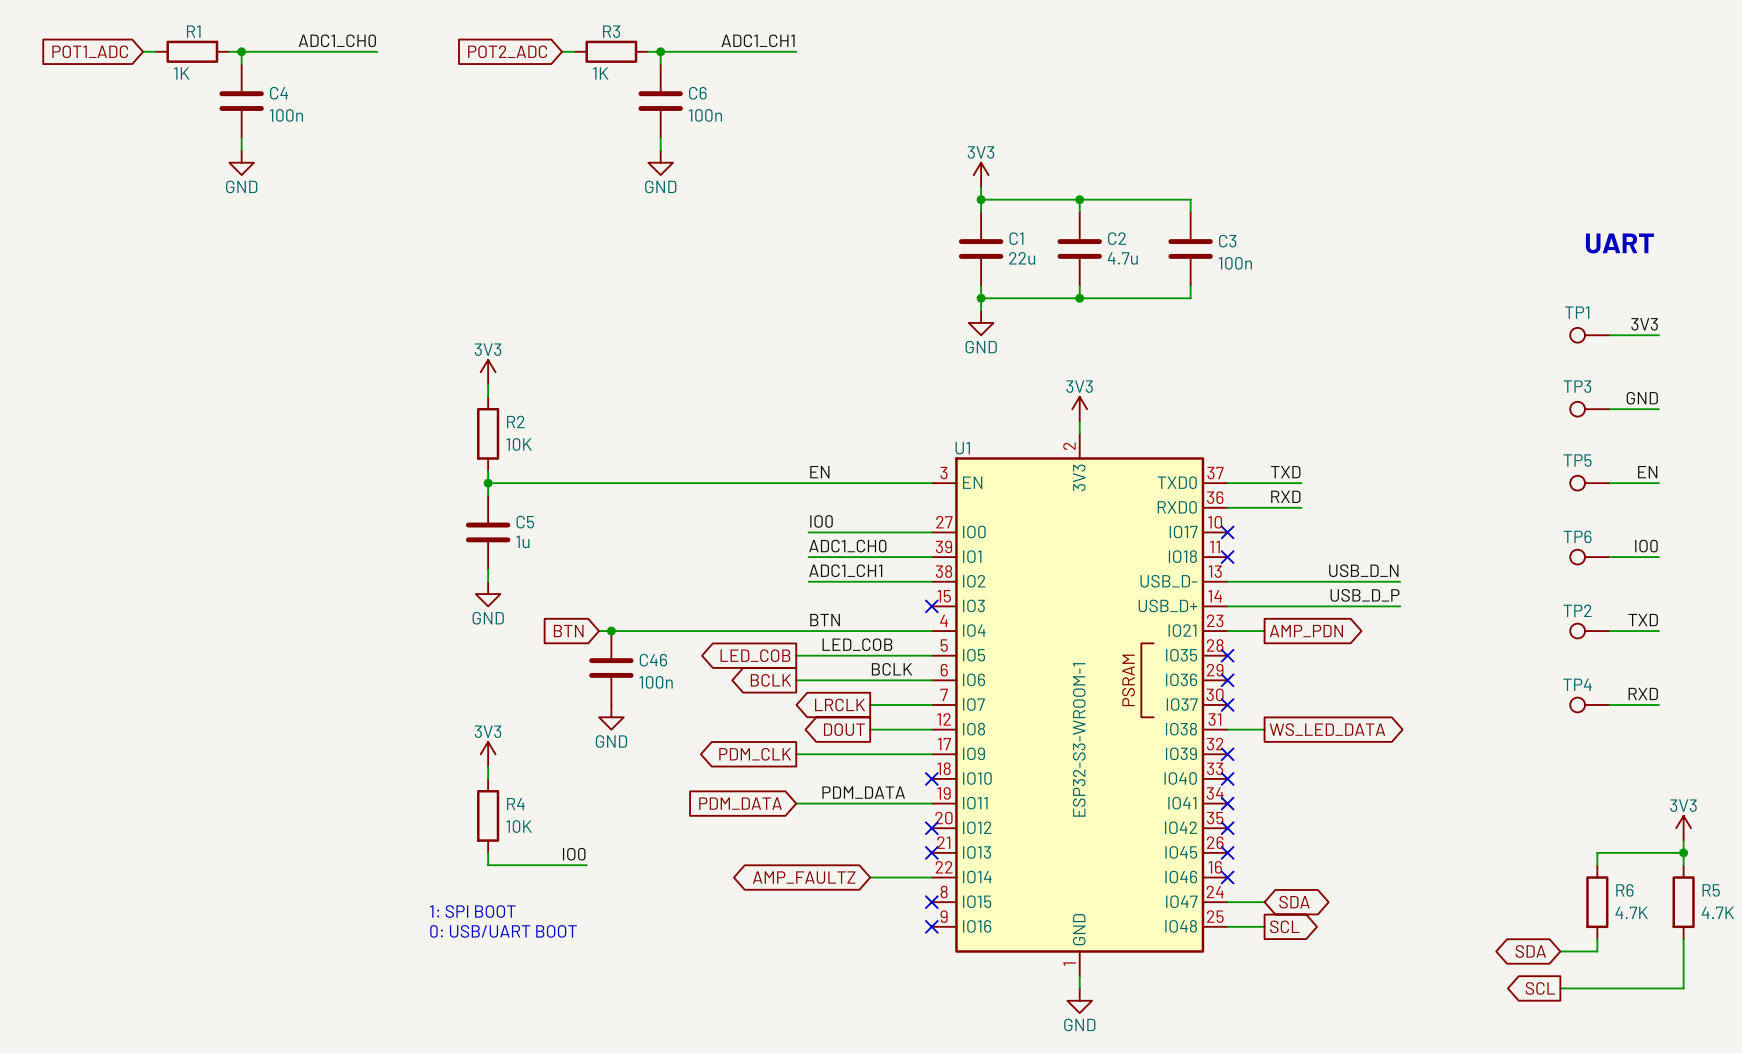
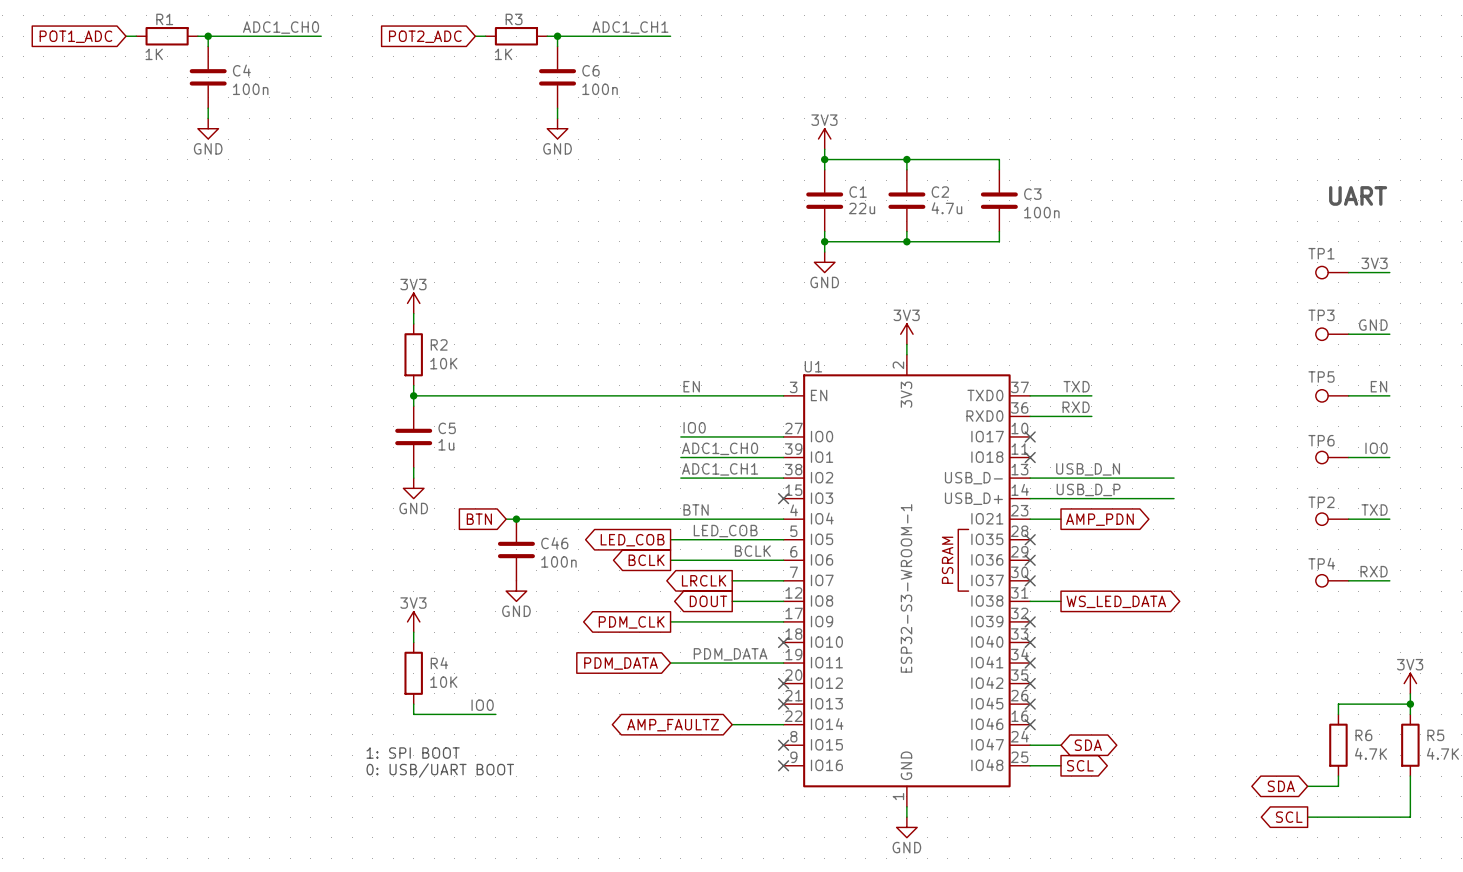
label position: USB_D_N (1363, 570) -> USB_D_N (1088, 469)
label position: USB_D_P (1365, 595) -> USB_D_P (1088, 489)

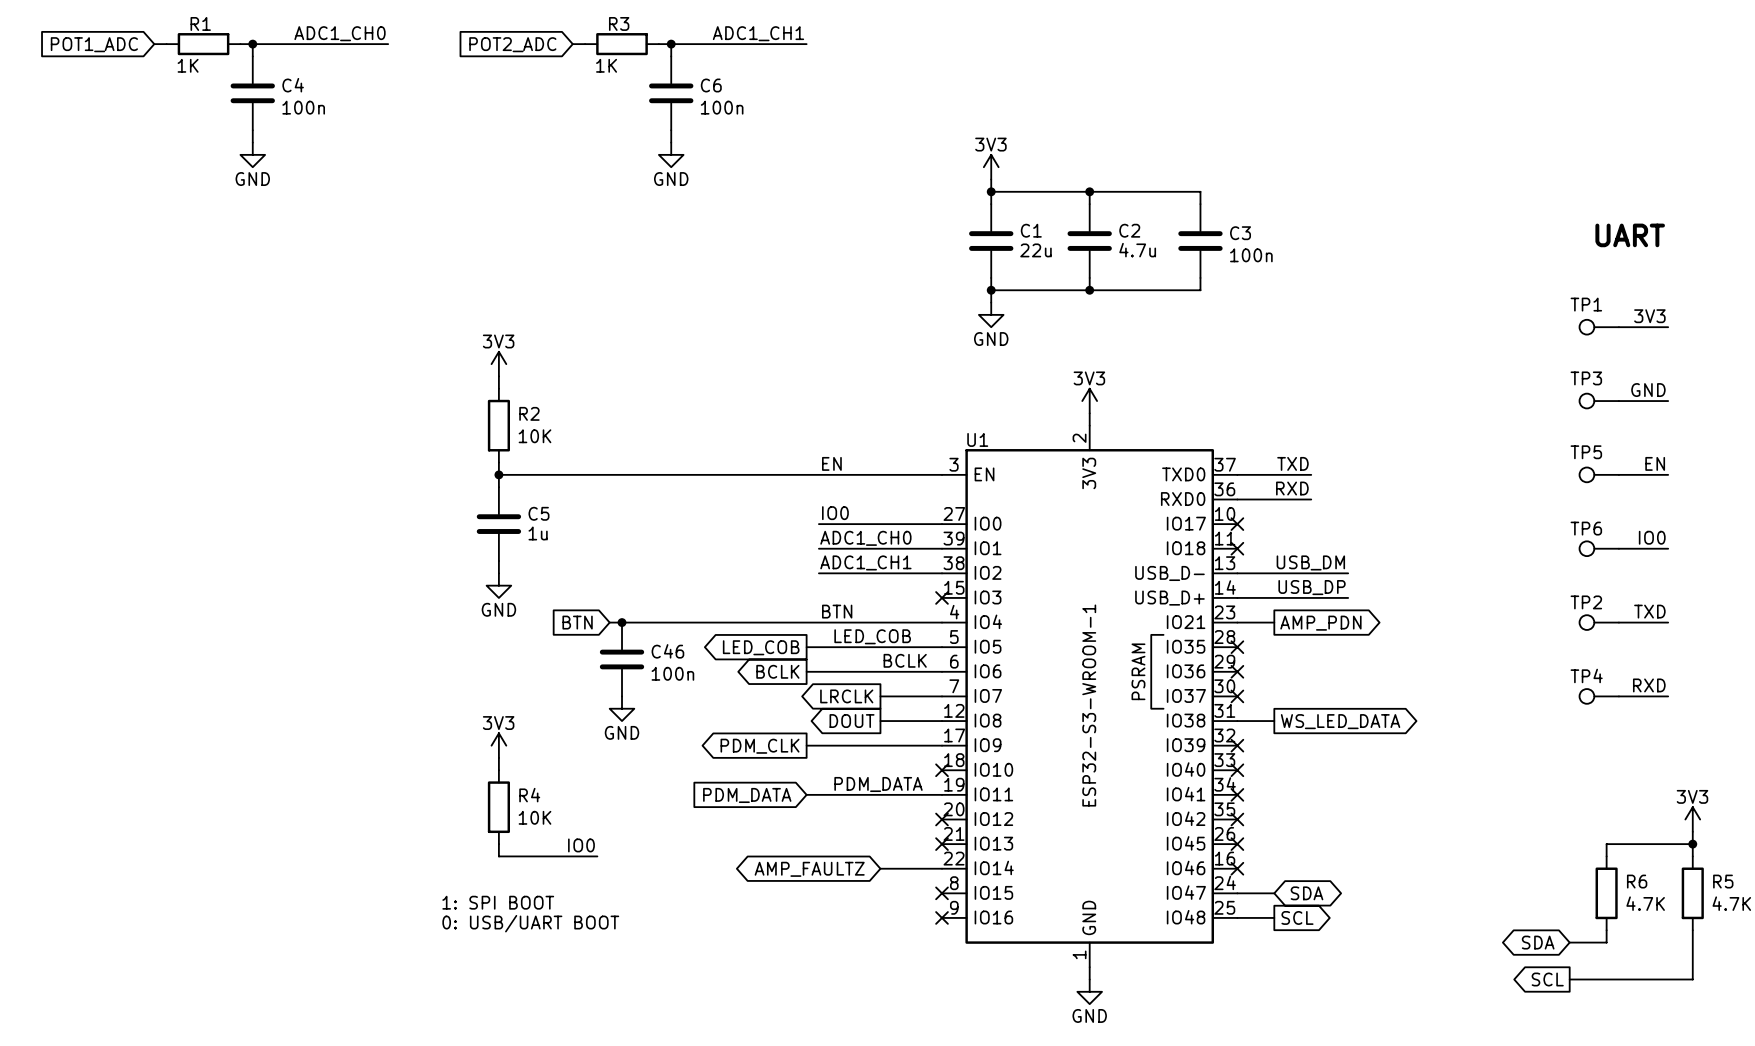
label: USB_D_N (1088, 469) -> USB_DM (1310, 562)
wire: (1122, 478) (1174, 478) -> none
label: USB_D_P (1088, 489) -> USB_DP (1312, 587)
wire: (1122, 498) (1174, 498) -> none

